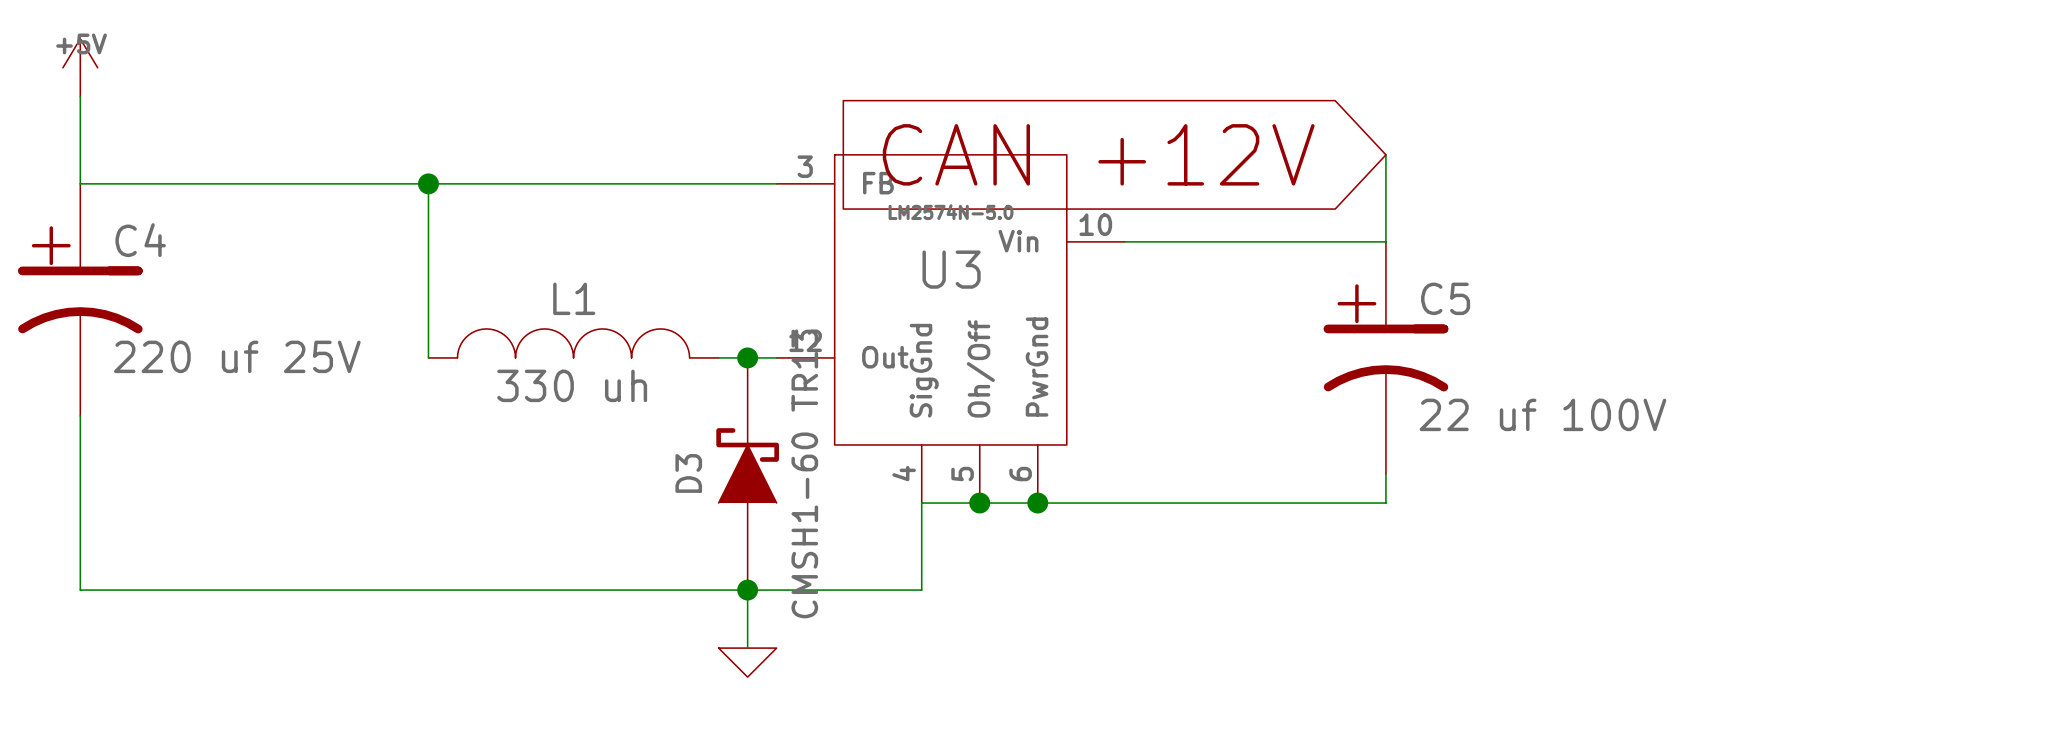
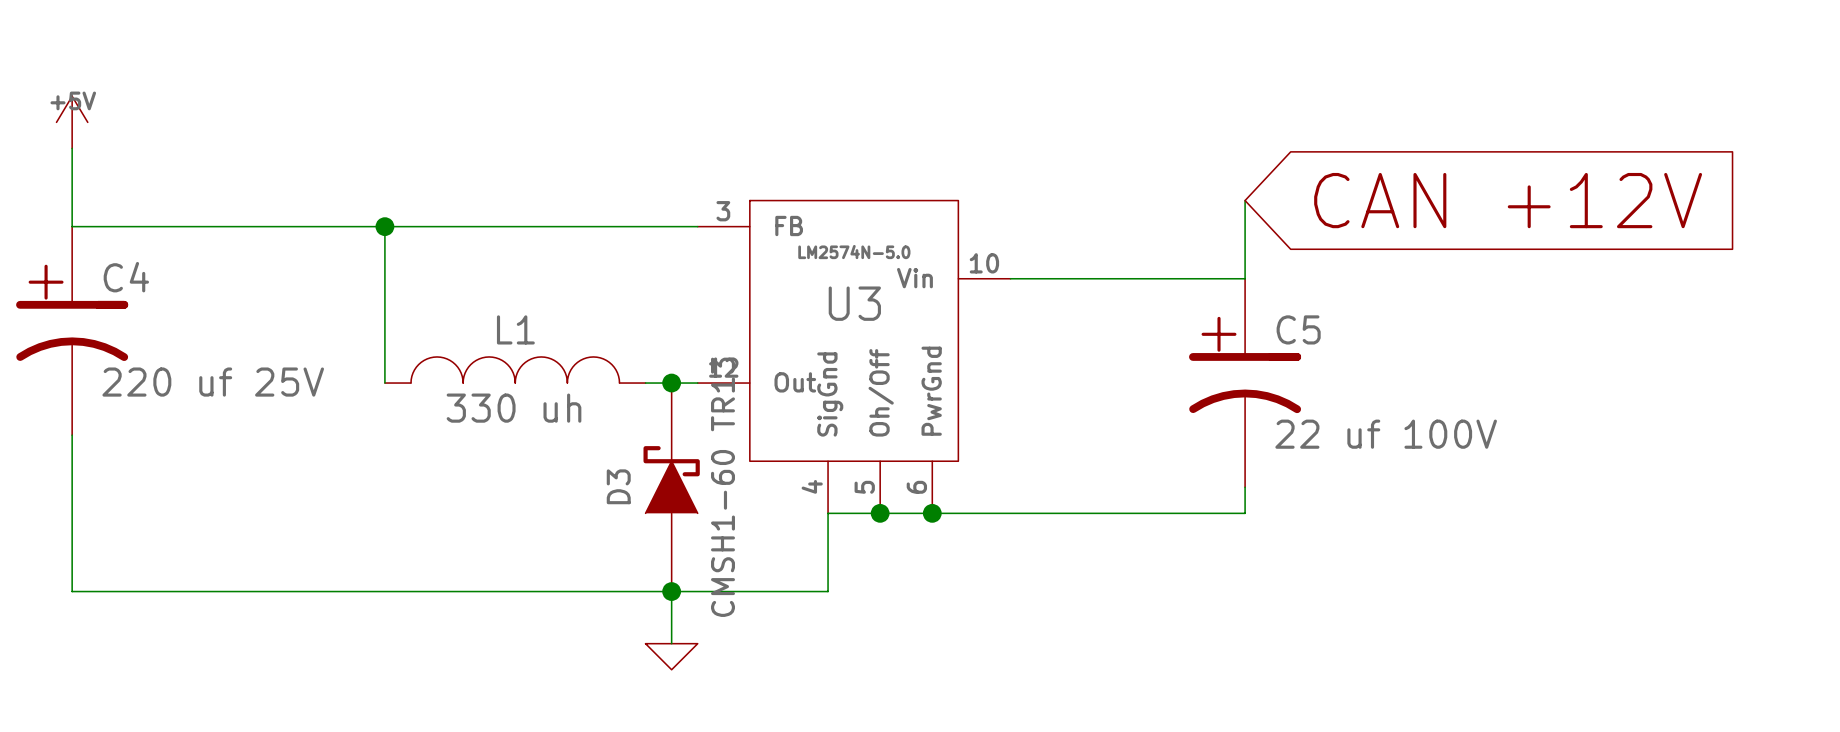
global label rotation: 0° (1098, 154) -> 180° (1508, 200)

